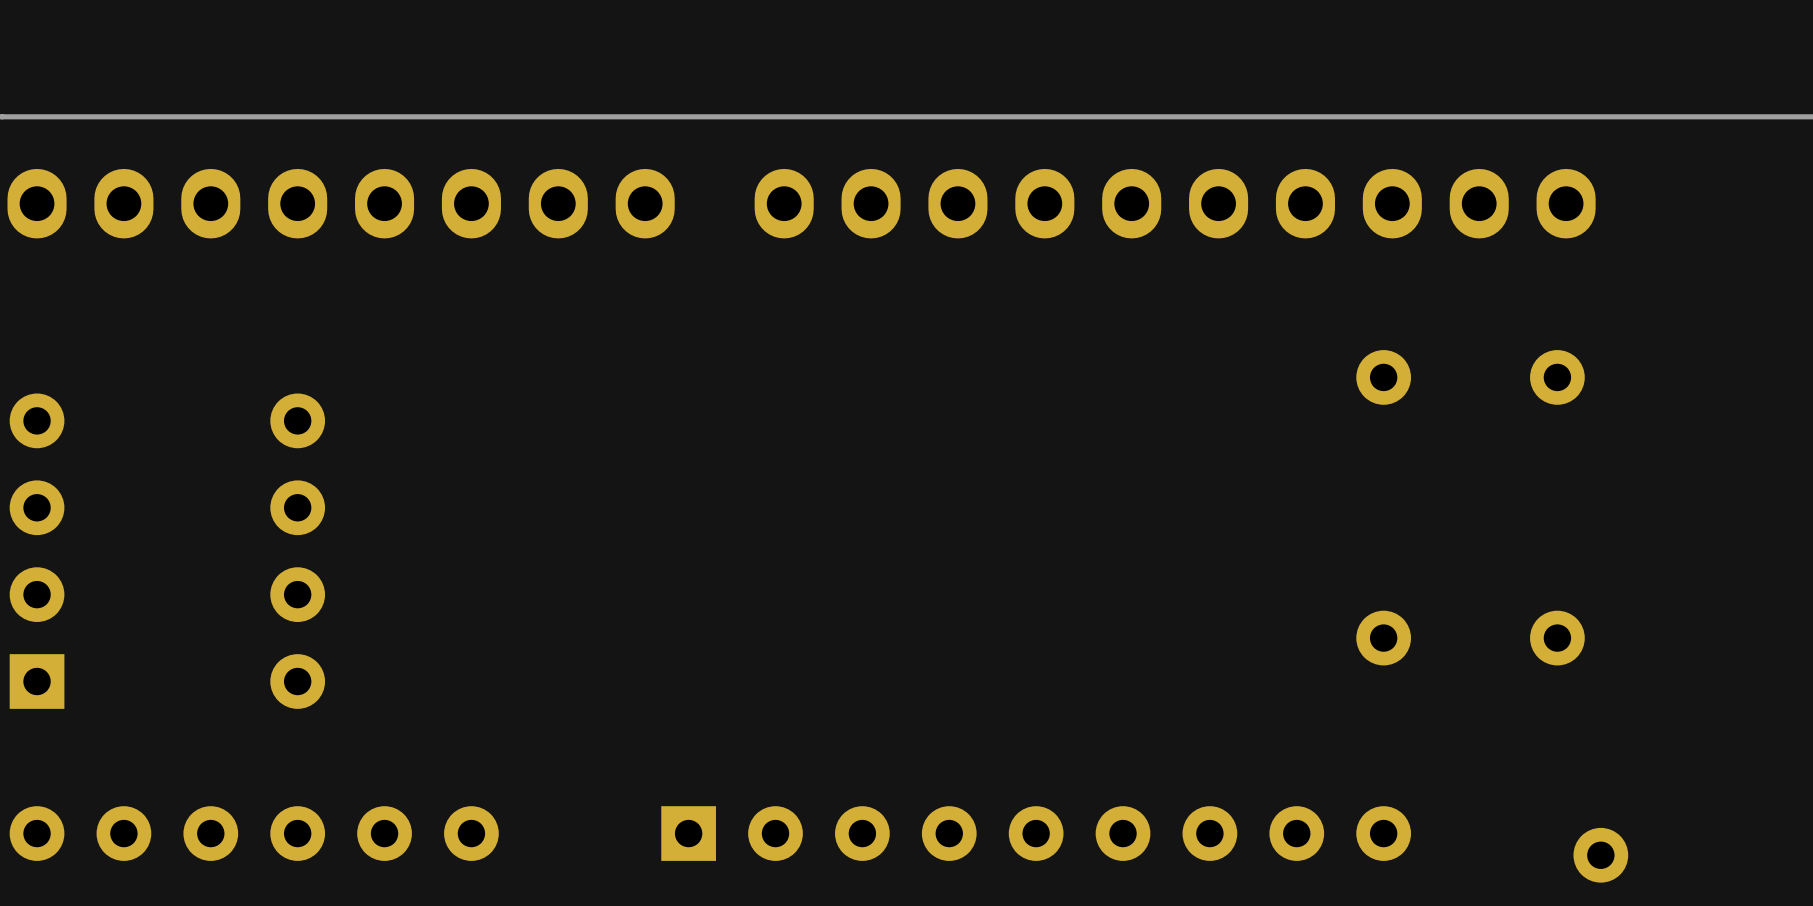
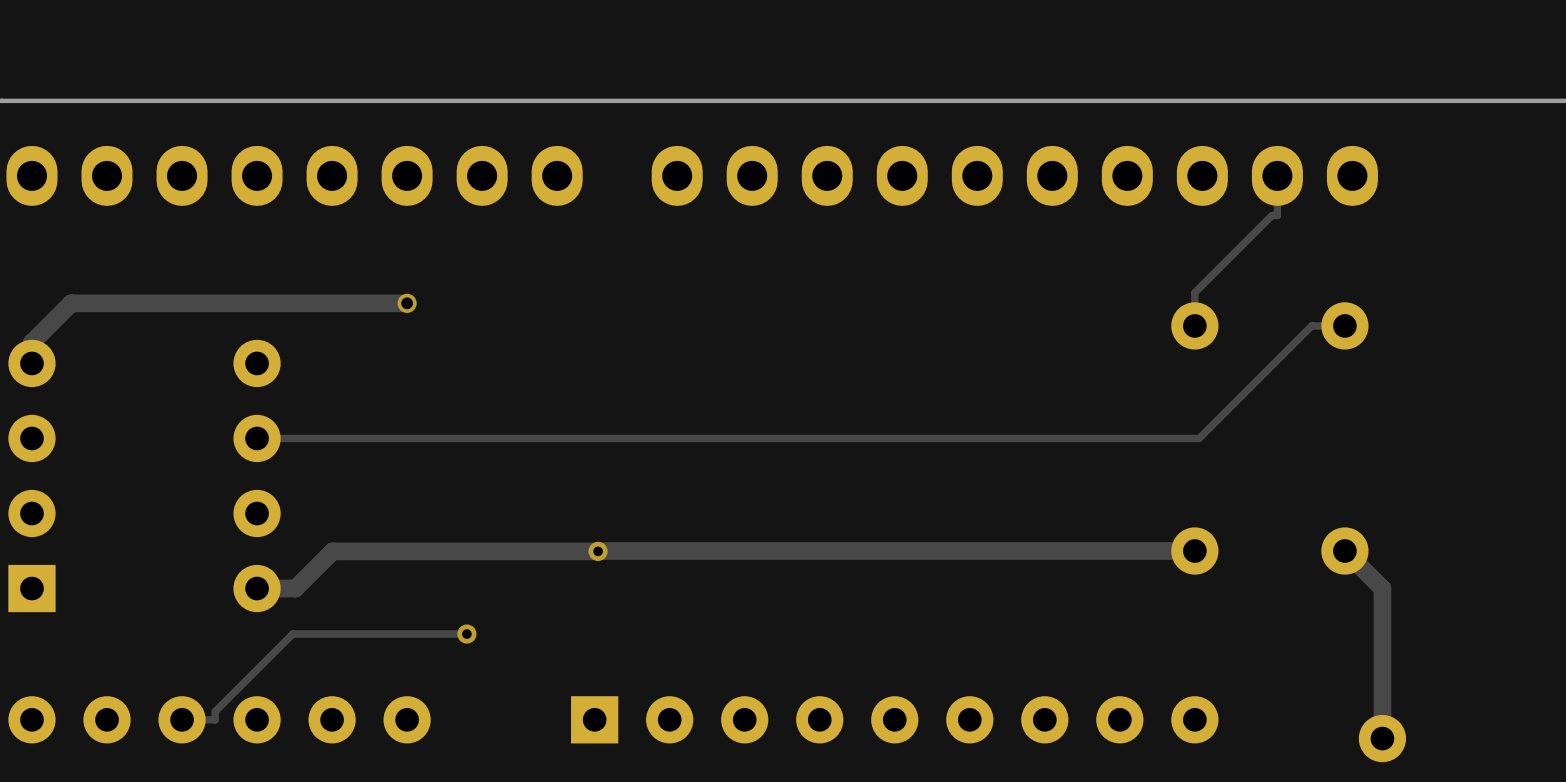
track: none -> (1277, 175) (1277, 215) (1272, 215) (1194, 292) (1194, 325)
track: none -> (407, 303) (71, 303) (31, 342) (31, 363)
via: none -> (407, 303)
track: none -> (1344, 325) (1311, 325) (1199, 438) (257, 438)
track: none -> (598, 551) (332, 551) (295, 588) (257, 588)
via: none -> (598, 551)
track: none -> (1194, 551) (598, 551)
track: none -> (1344, 551) (1382, 588) (1382, 738)
track: none -> (466, 634) (292, 634) (215, 711) (215, 719) (182, 719)
via: none -> (466, 634)

